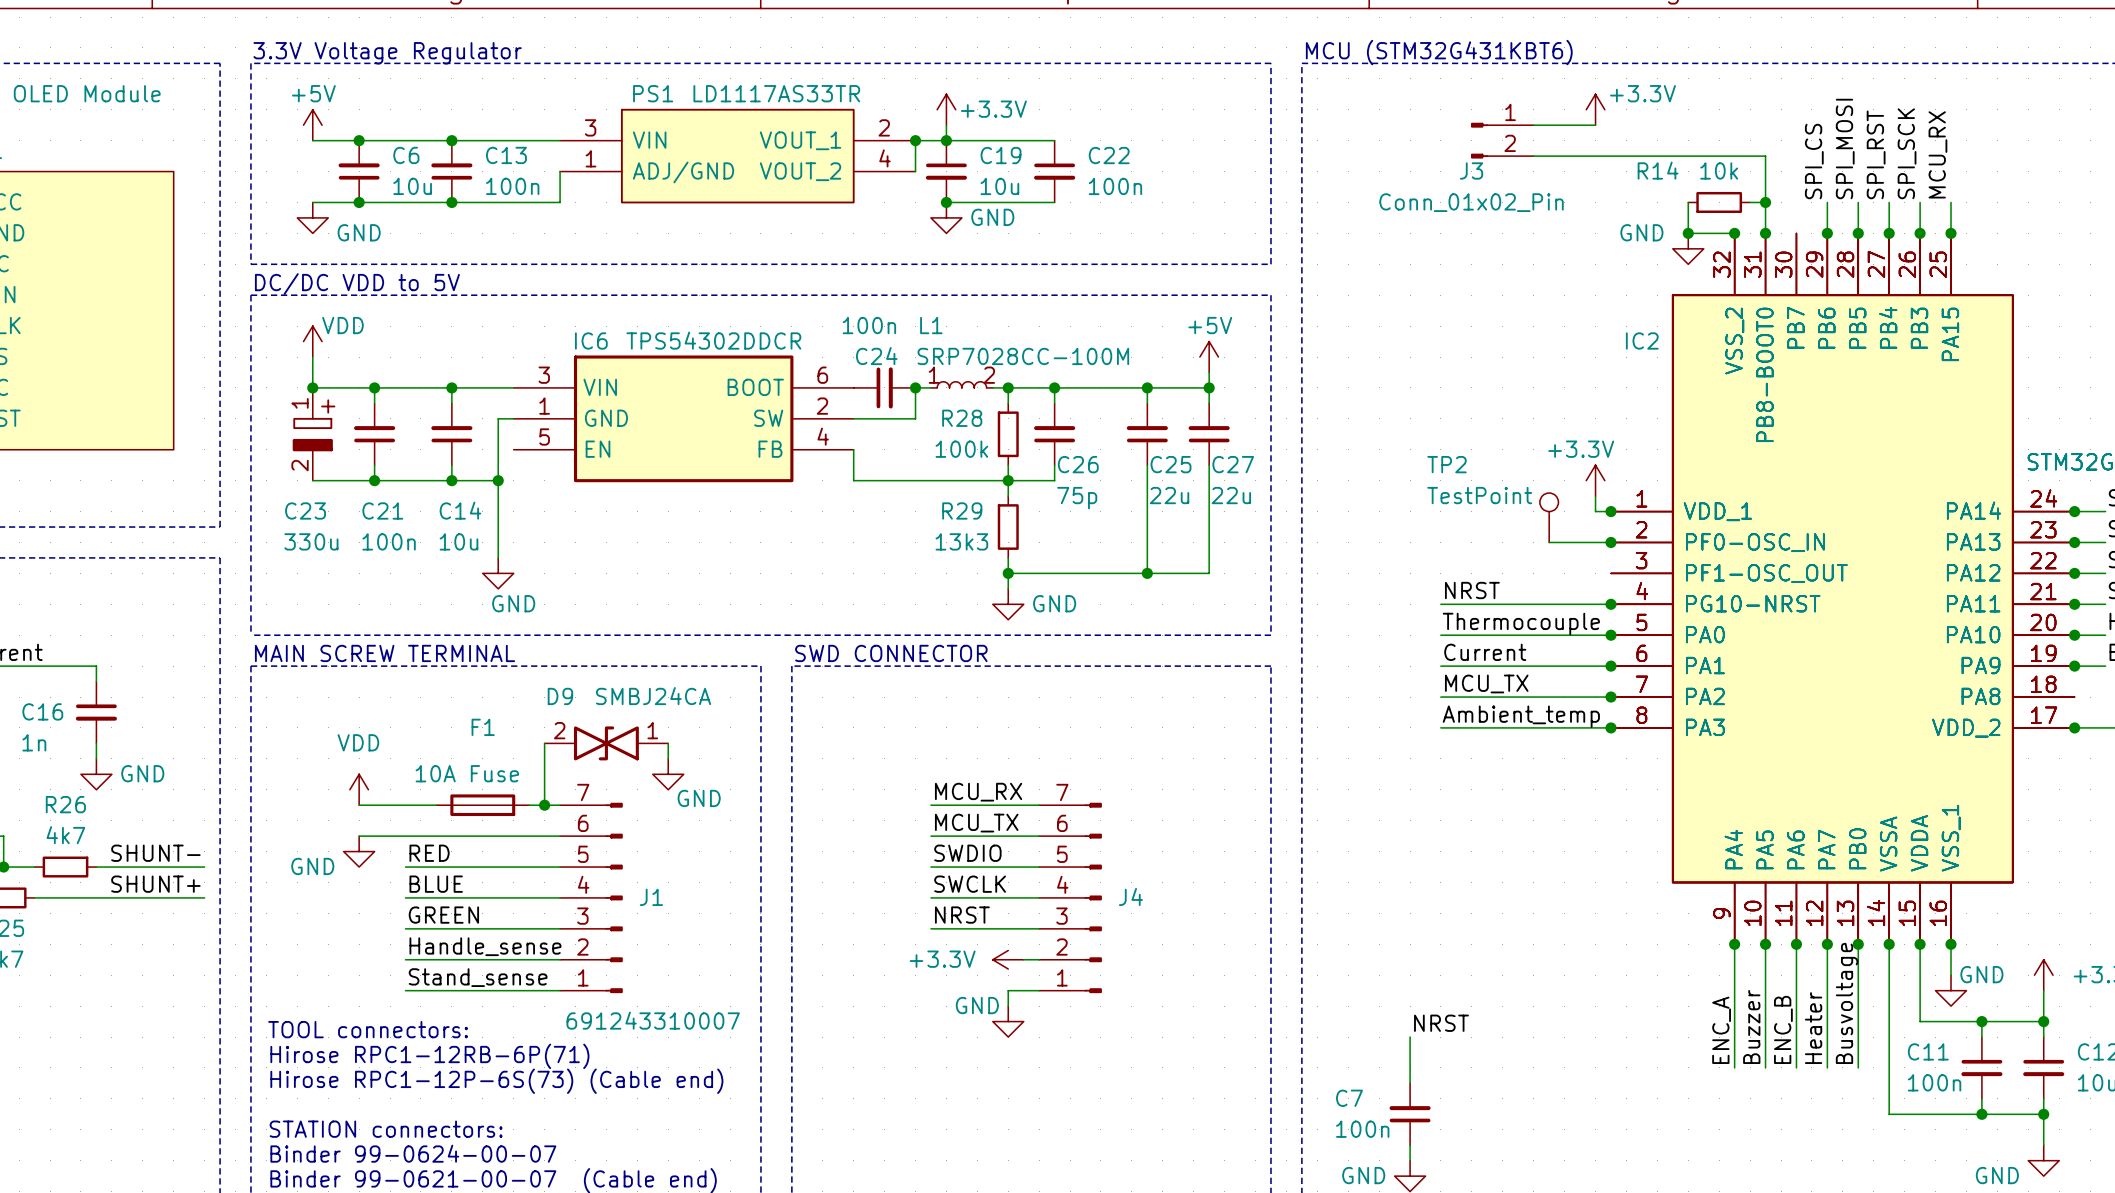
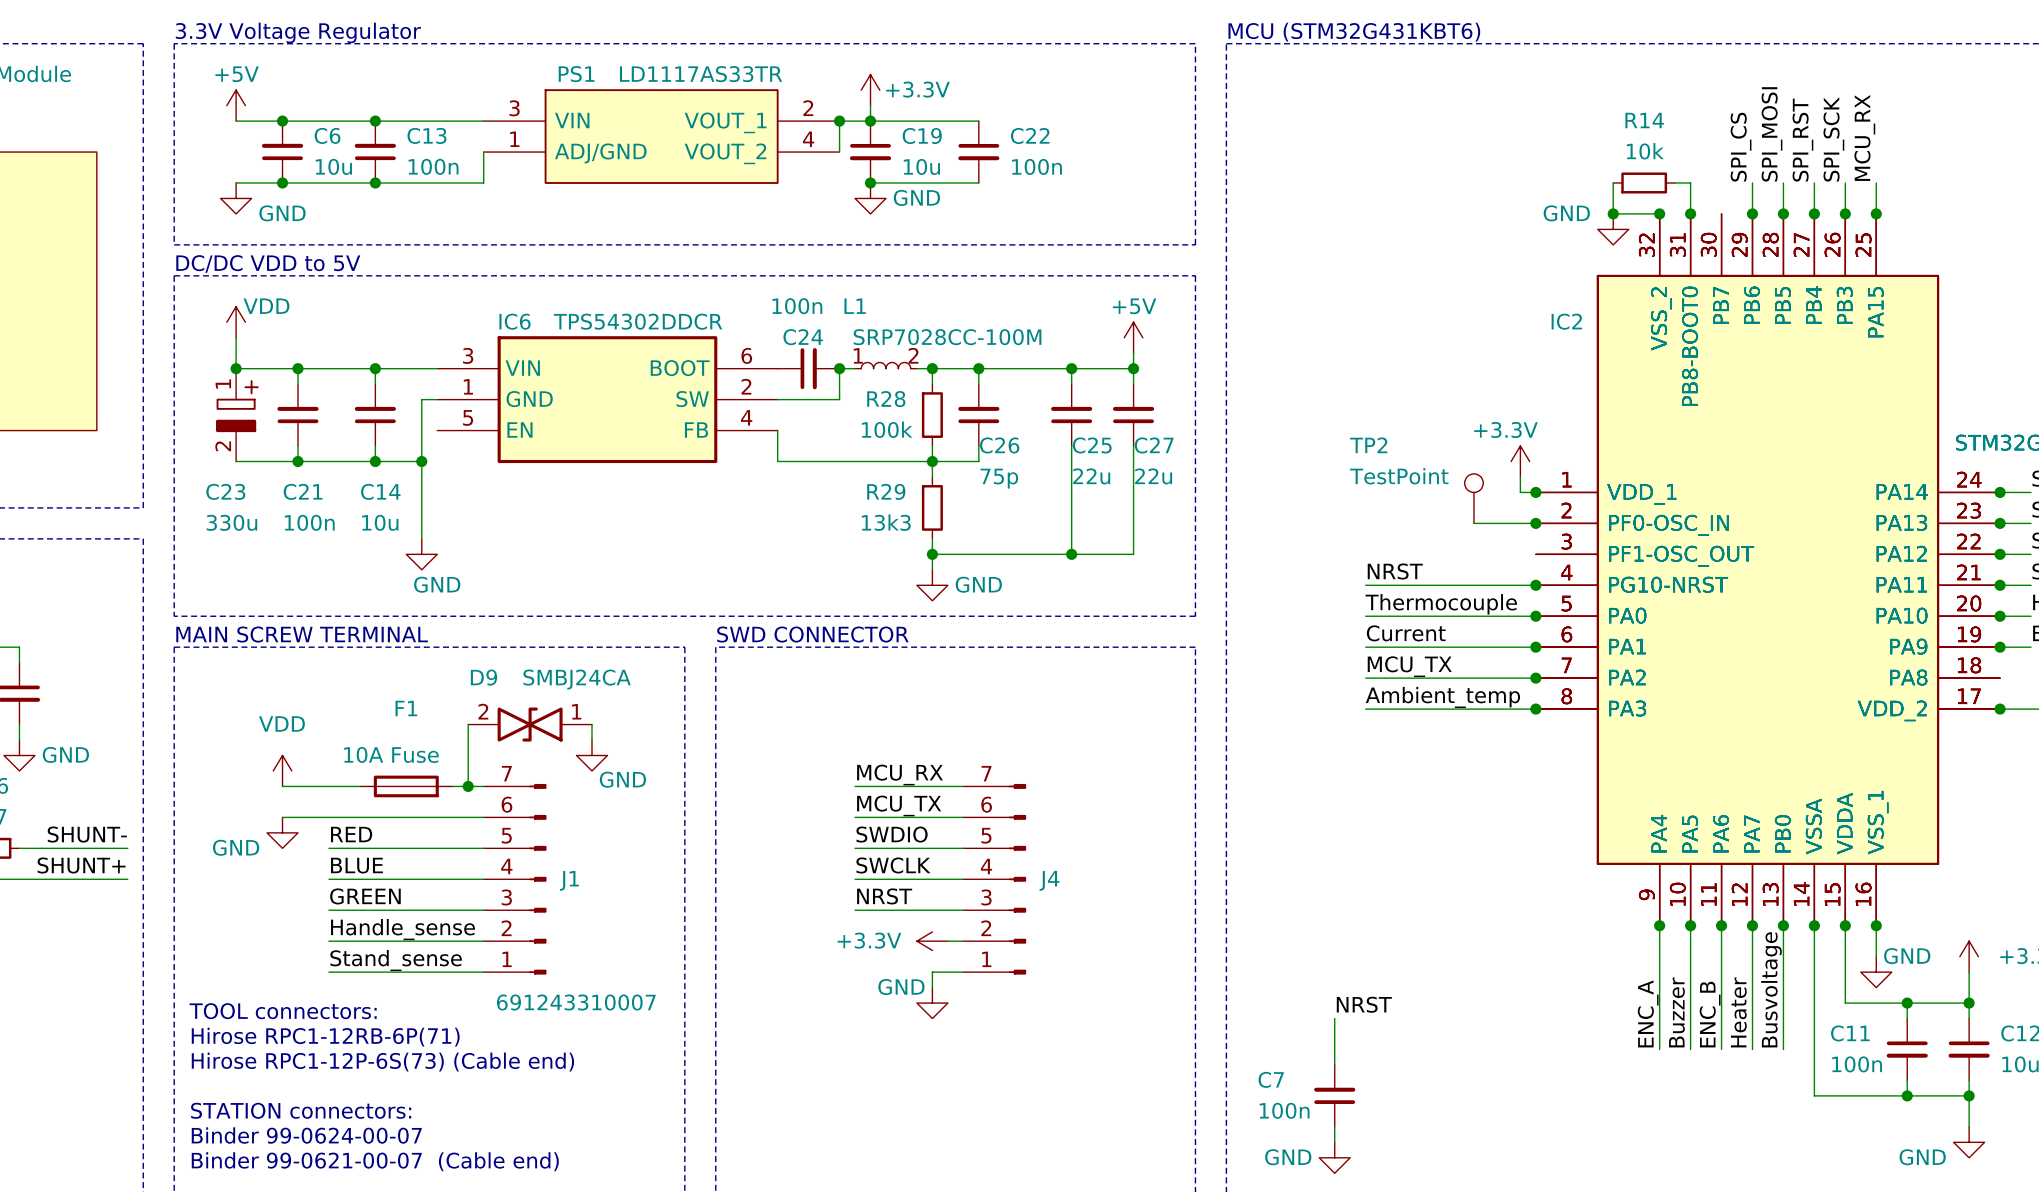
power symbol: +3.3V (1595, 109) -> none
wire: (1533, 125) (1595, 125) -> none
J3: Conn_01x02_Pin (1502, 140) -> none
wire: (1533, 156) (1765, 156) (1765, 202) -> none
R14 name position: R14 (1658, 170) -> R14 (1644, 120)
junction: (1765, 202) -> none

